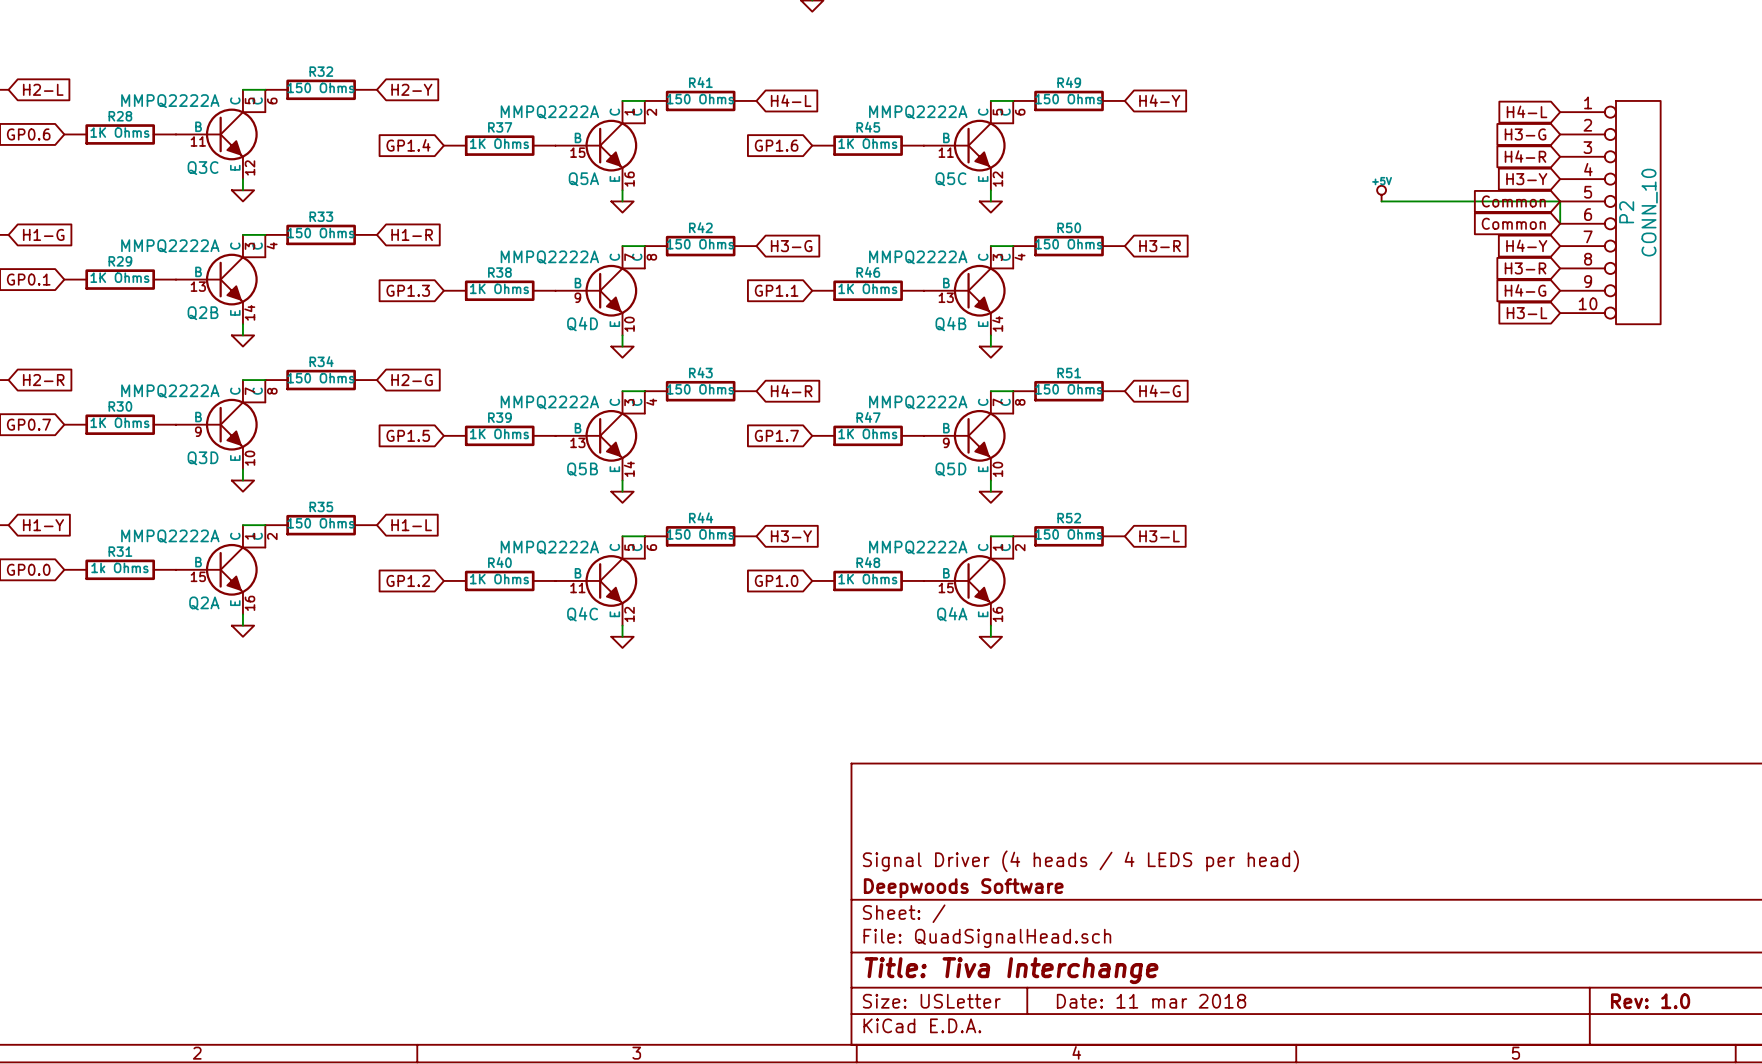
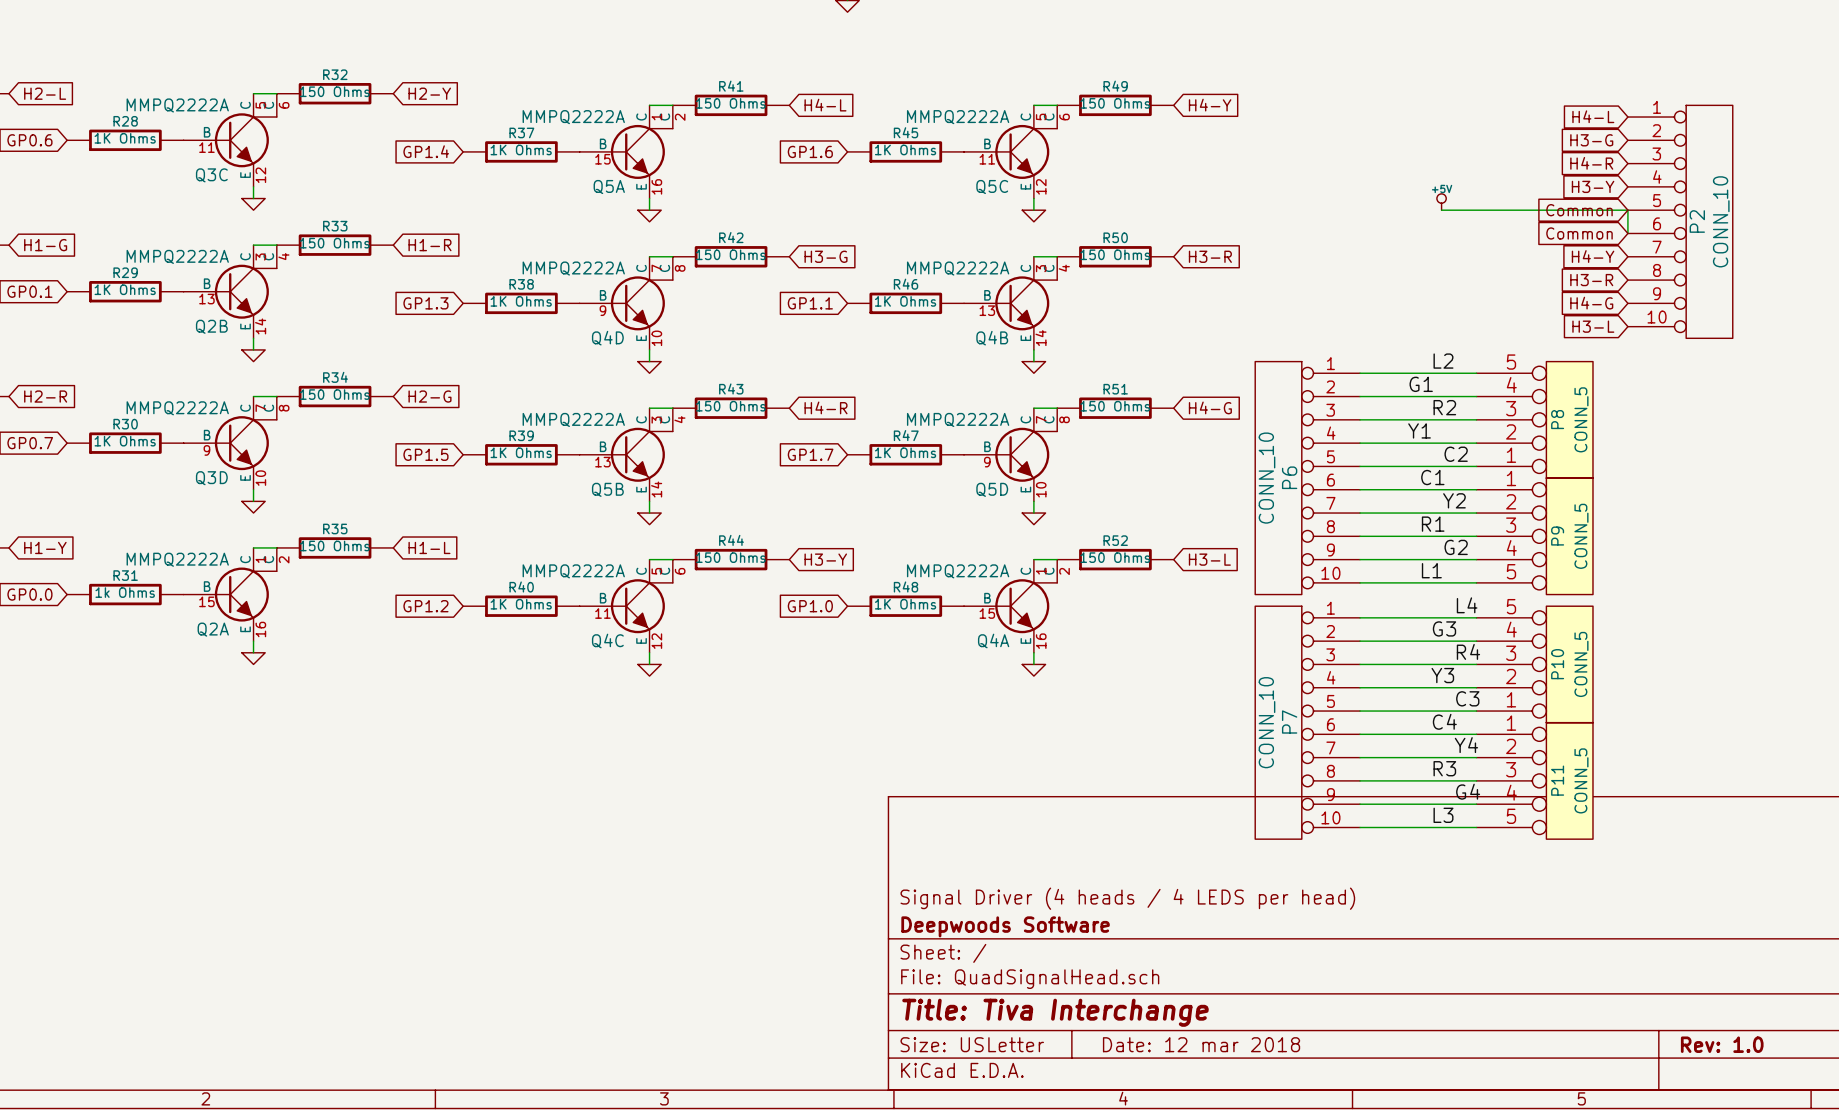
label: none -> L2 (1443, 361)
wire: none -> (1360, 373) (1476, 373)
label: none -> G1 (1421, 384)
wire: none -> (1360, 396) (1476, 396)
label: none -> R2 (1444, 407)
wire: none -> (1360, 419) (1476, 419)
P8: none -> CONN_5 (1534, 419)
label: none -> Y1 (1419, 430)
wire: none -> (1360, 443) (1476, 443)
label: none -> C2 (1456, 454)
wire: none -> (1360, 466) (1476, 466)
label: none -> C1 (1432, 477)
P6: none -> CONN_10 (1307, 478)
wire: none -> (1360, 489) (1476, 489)
label: none -> Y2 (1454, 500)
wire: none -> (1360, 513) (1476, 513)
label: none -> R1 (1433, 524)
wire: none -> (1360, 536) (1476, 536)
P9: none -> CONN_5 (1534, 536)
label: none -> G2 (1456, 547)
wire: none -> (1360, 559) (1476, 559)
label: none -> L1 (1431, 570)
wire: none -> (1360, 582) (1476, 582)
label: none -> L4 (1467, 605)
wire: none -> (1360, 617) (1476, 617)
label: none -> G3 (1444, 628)
wire: none -> (1360, 641) (1476, 641)
label: none -> R4 (1468, 651)
wire: none -> (1360, 664) (1476, 664)
P10: none -> CONN_5 (1534, 664)
label: none -> Y3 (1442, 675)
wire: none -> (1360, 687) (1476, 687)
label: none -> C3 (1467, 698)
wire: none -> (1360, 711) (1476, 711)
label: none -> C4 (1444, 721)
P7: none -> CONN_10 (1307, 722)
wire: none -> (1360, 734) (1476, 734)
label: none -> Y4 (1466, 745)
wire: none -> (1360, 757) (1476, 757)
label: none -> R3 (1444, 768)
wire: none -> (1360, 780) (1476, 780)
P11: none -> CONN_5 (1534, 780)
label: none -> G4 (1468, 791)
wire: none -> (1360, 804) (1476, 804)
label: none -> L3 (1443, 815)
wire: none -> (1360, 827) (1476, 827)
title block: Date: 11 mar 2018 (1151, 1001) -> Date: 12 mar 2018 (1201, 1044)

